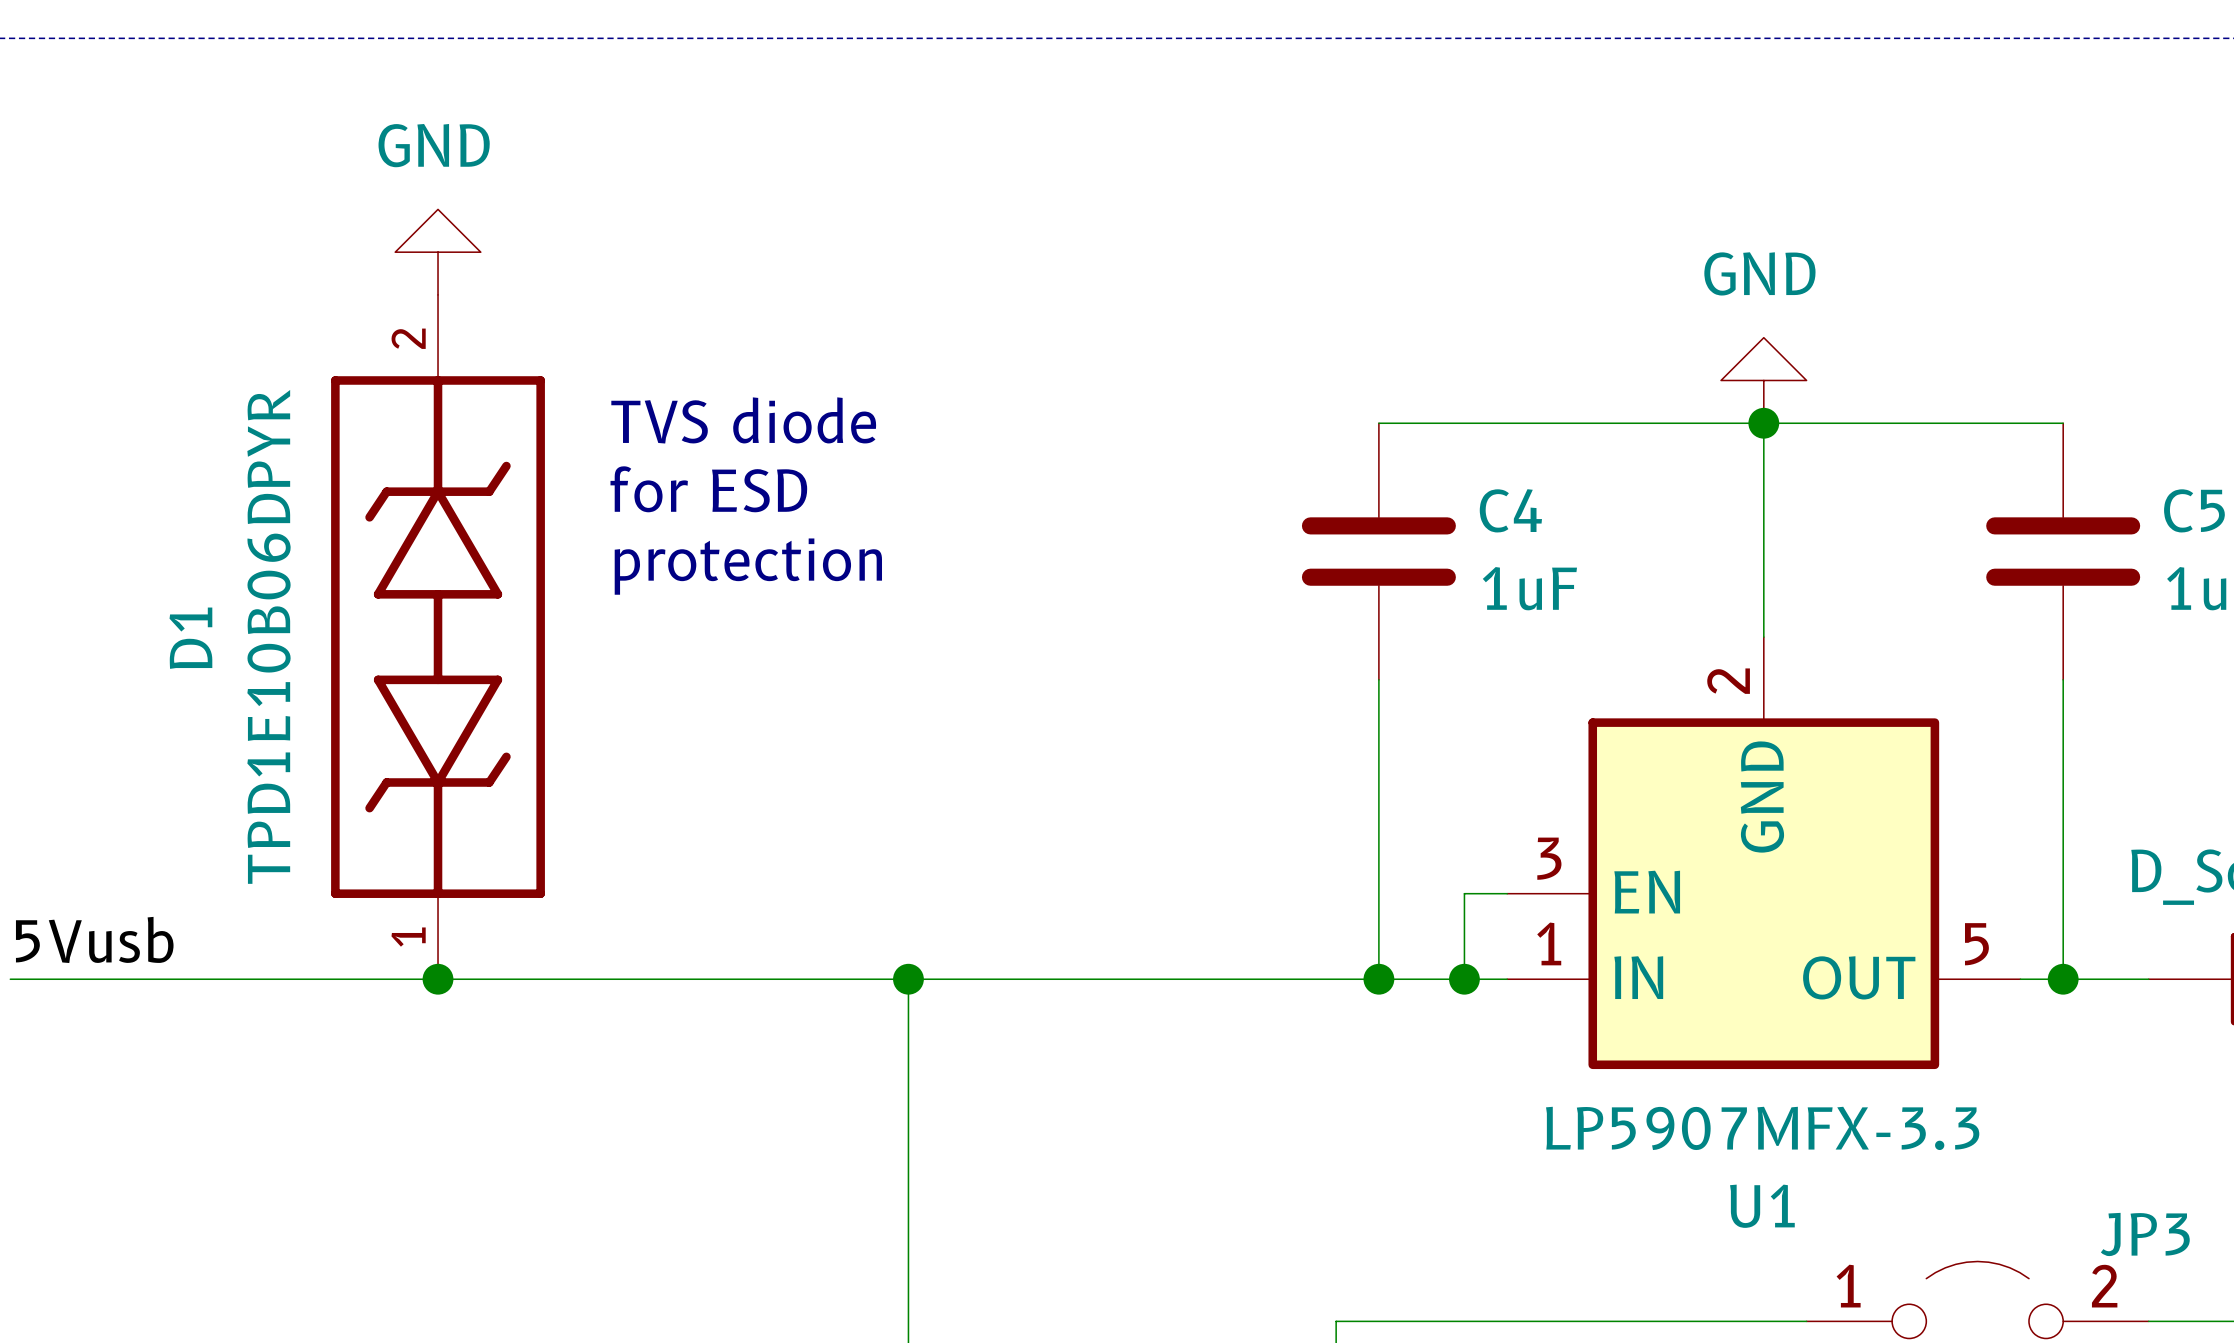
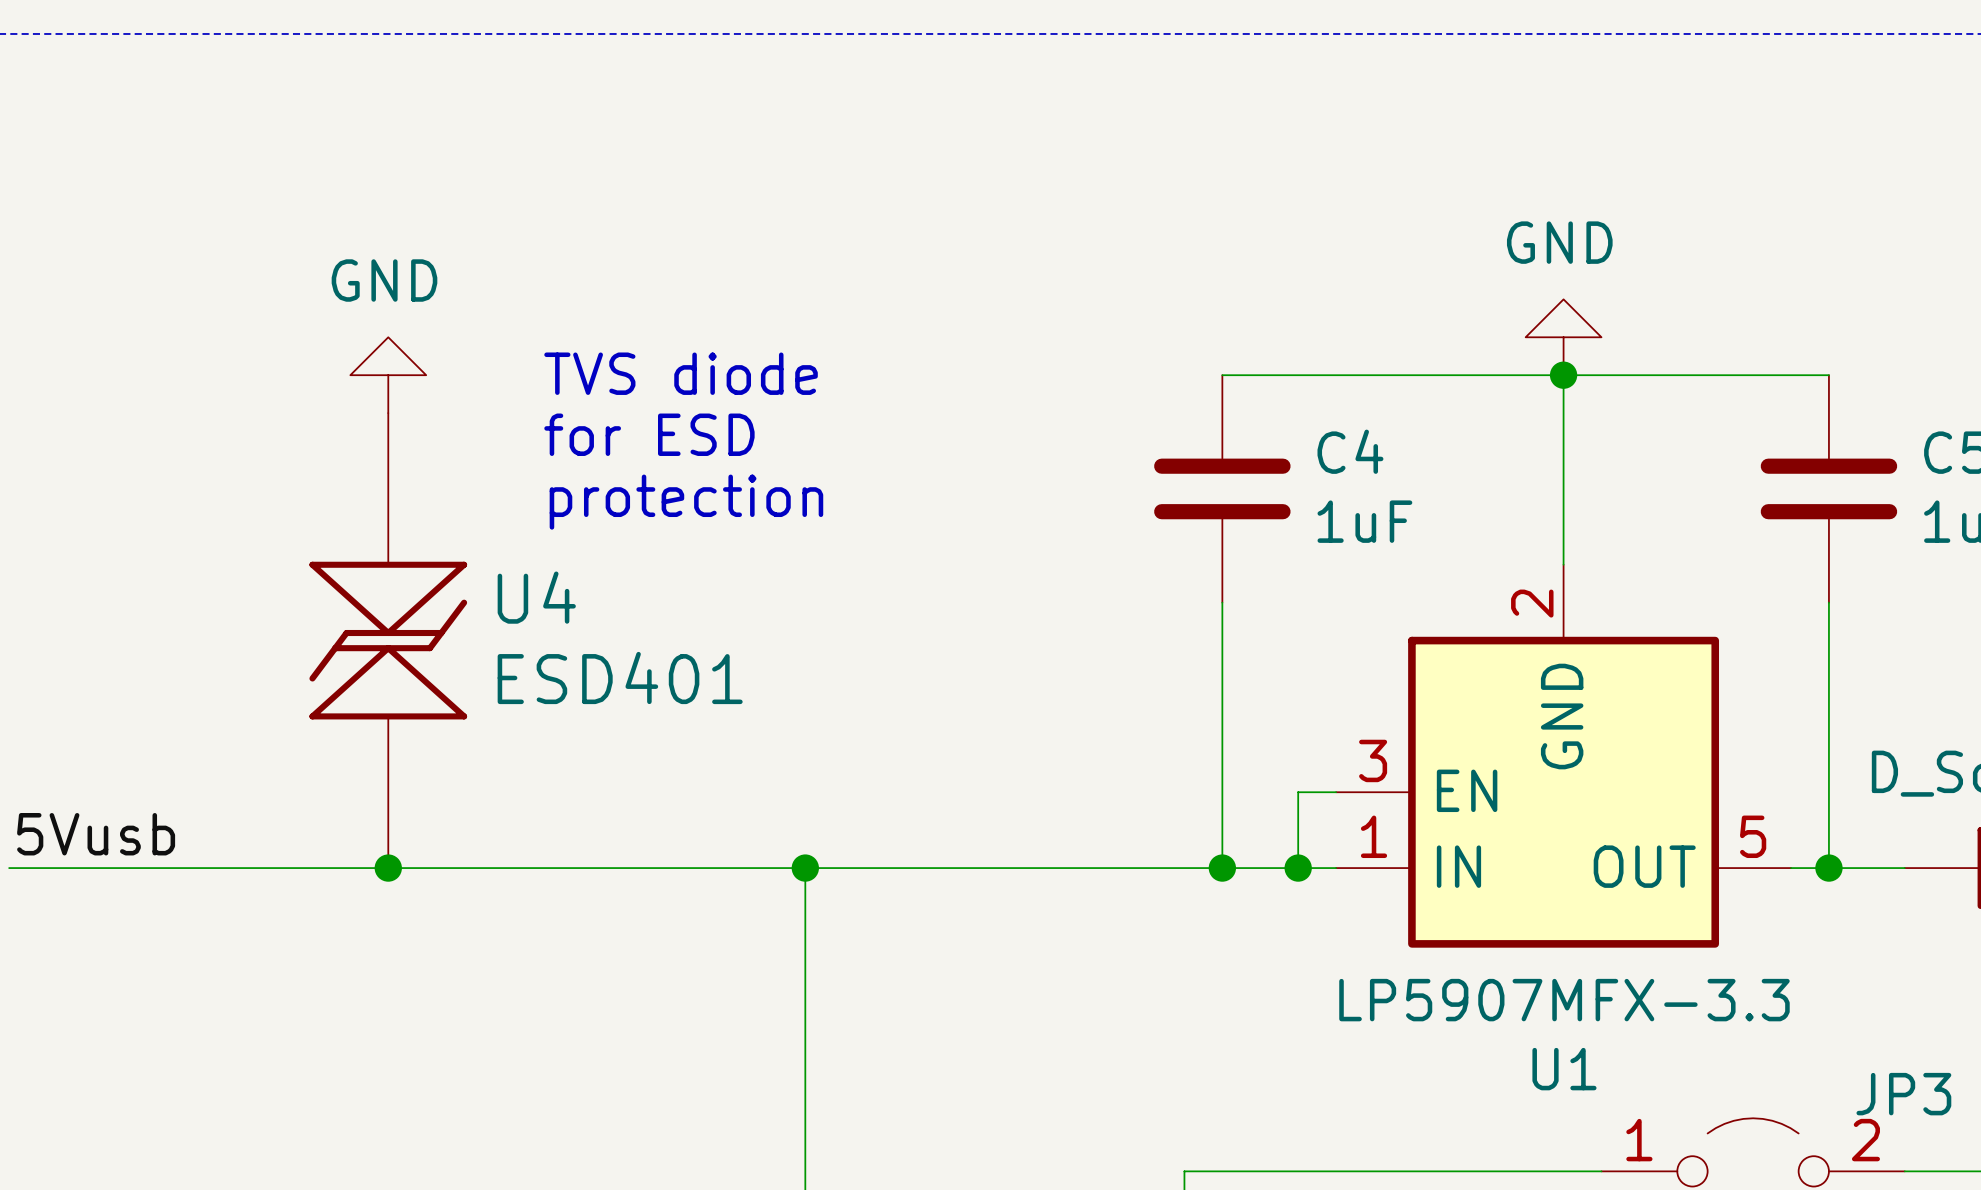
power symbol position: GND (438, 252) -> GND (388, 375)
D1: TPD1E10B06DPYR (438, 637) -> none
U4: none -> ESD401 (388, 640)

